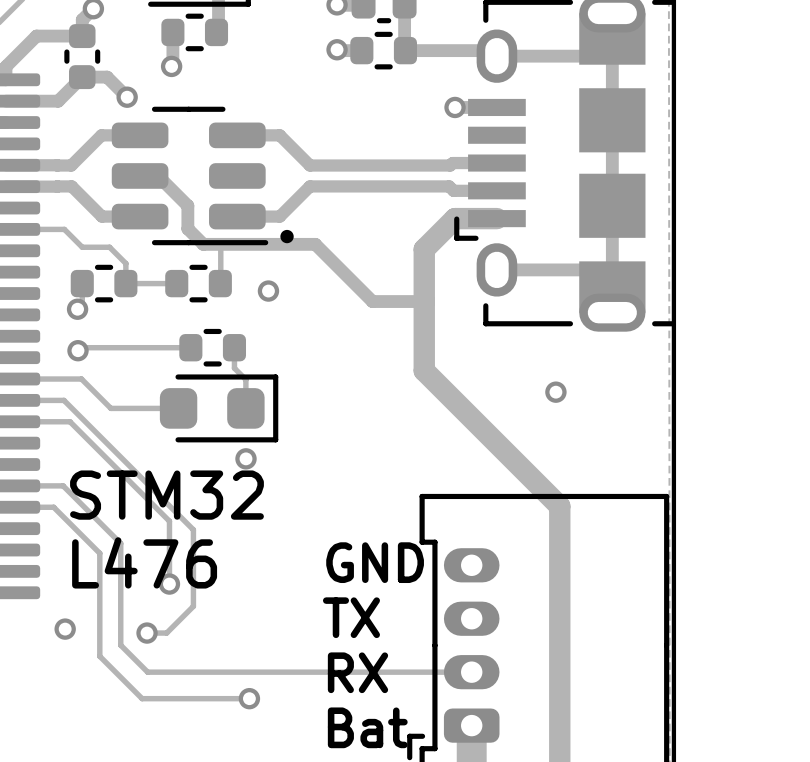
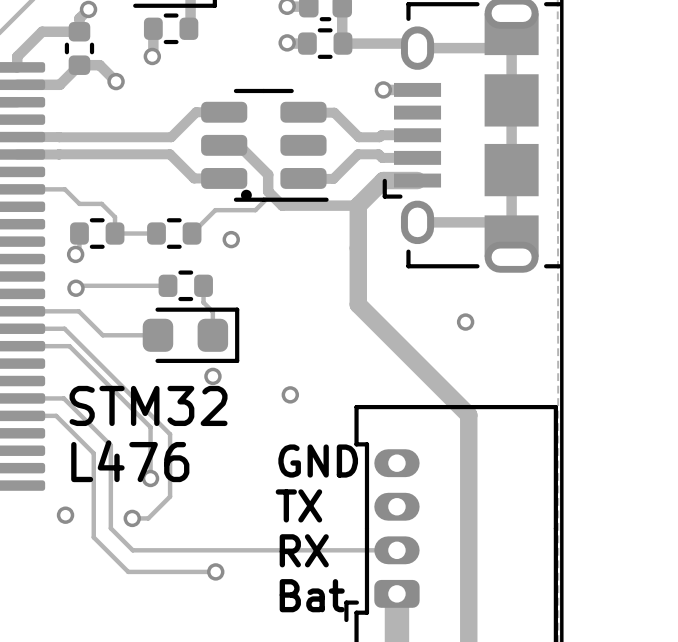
track: (140, 135) (101, 135) (71, 165) -> (224, 112) (196, 112) (171, 137) (70, 137)
track: (237, 135) (279, 135) (309, 165) (425, 165) -> (303, 112) (334, 112) (358, 137)
track: (140, 175) (158, 175) (187, 205) (187, 228) (203, 244) (315, 244) (372, 301) (424, 301) -> none
part position: (190, 175) -> (264, 145)
track: none -> (224, 145) (238, 145) (268, 174) (268, 191)
track: (71, 186) (101, 216) (140, 216) -> (70, 154) (169, 154) (194, 178) (224, 178)
track: (423, 186) (309, 186) (279, 216) (237, 216) -> (358, 154) (333, 178) (303, 178)
track: none -> (268, 191) (282, 205) (358, 205)
track: (220, 244) (220, 283) -> (268, 191) (268, 197) (255, 210) (215, 210) (192, 233)
via: none -> (290, 394)

